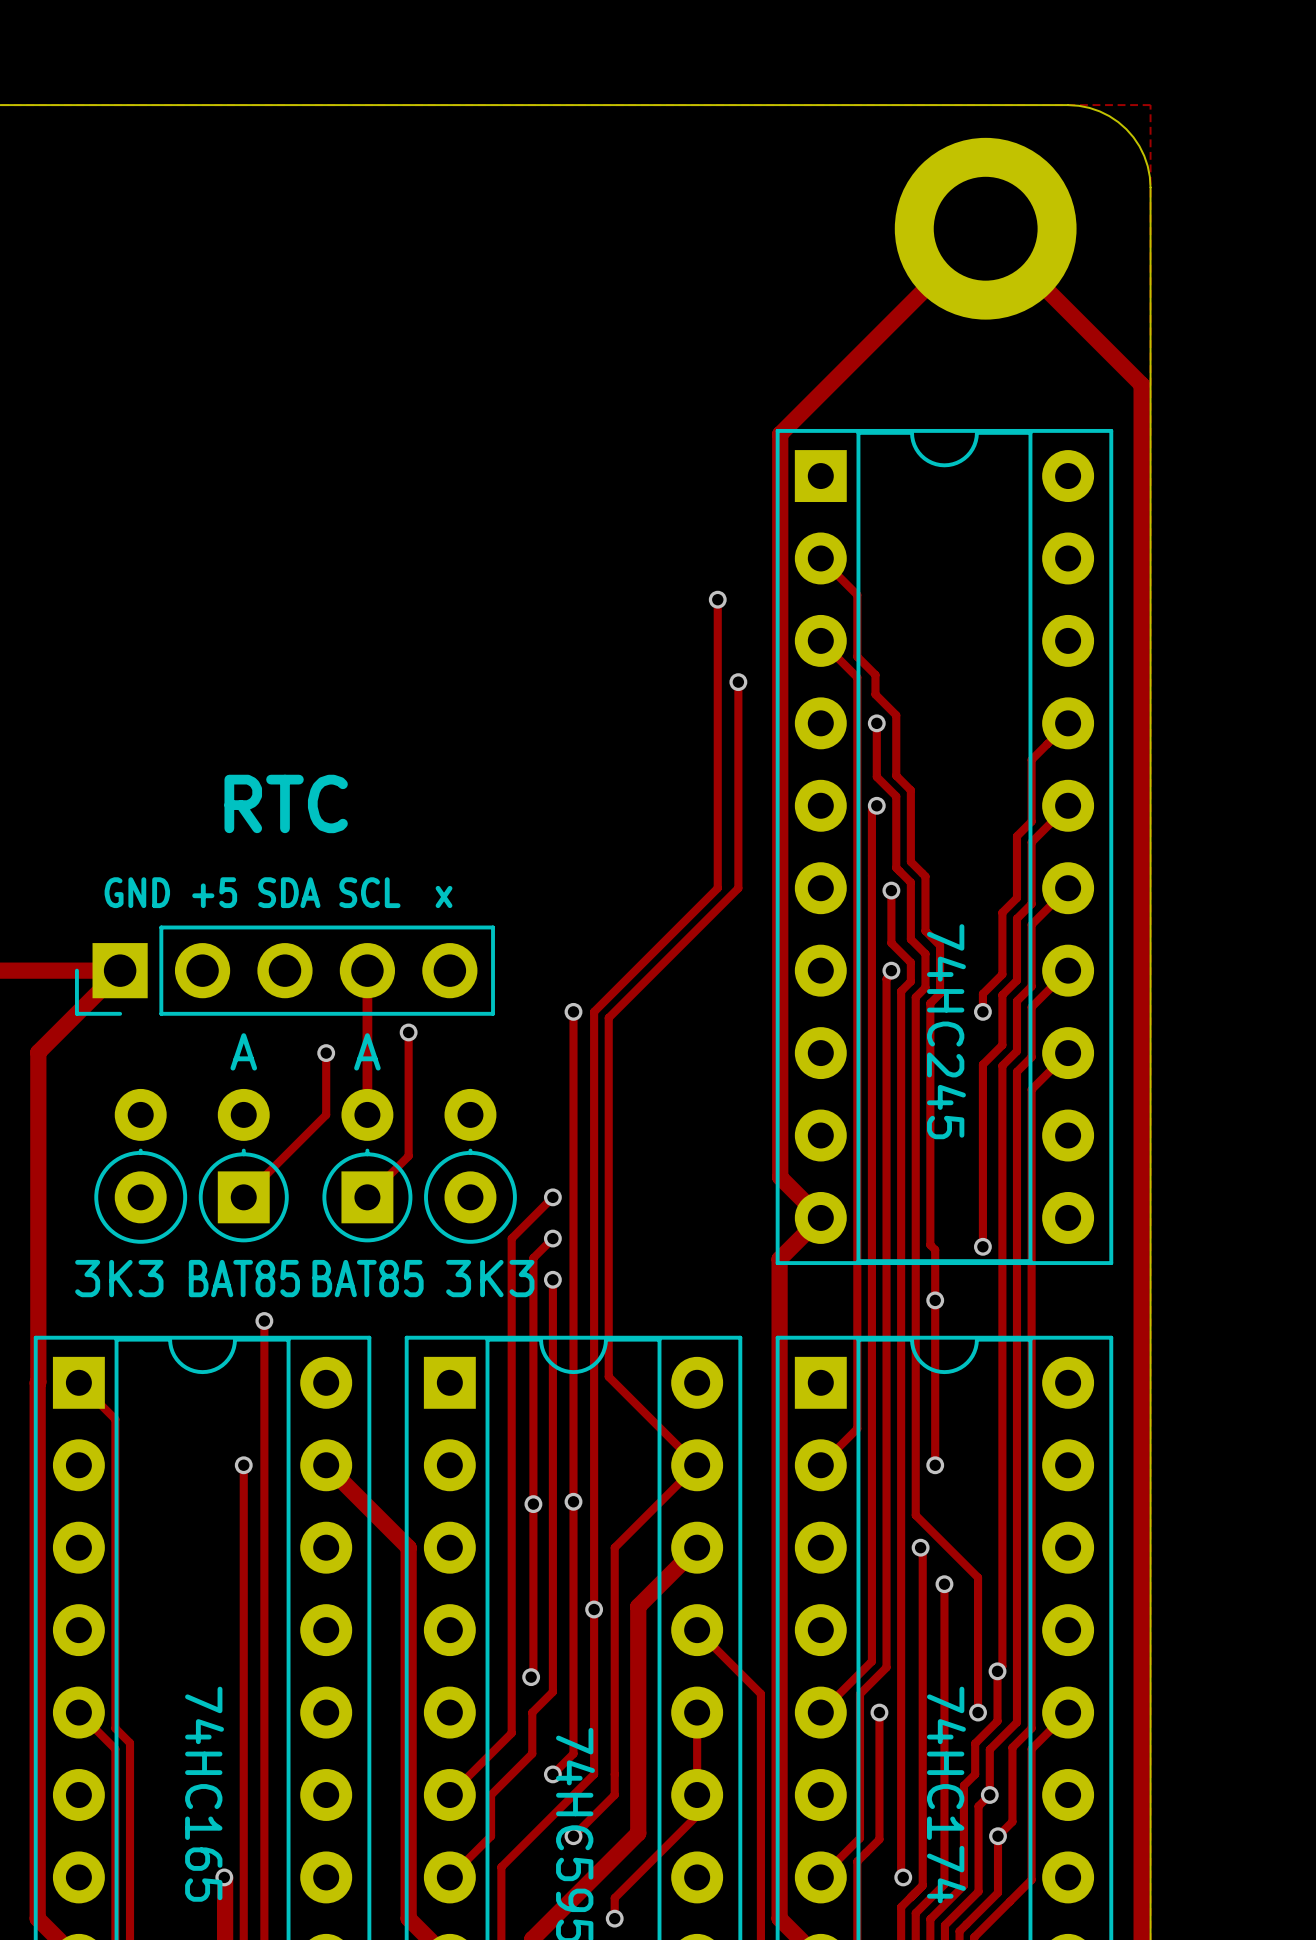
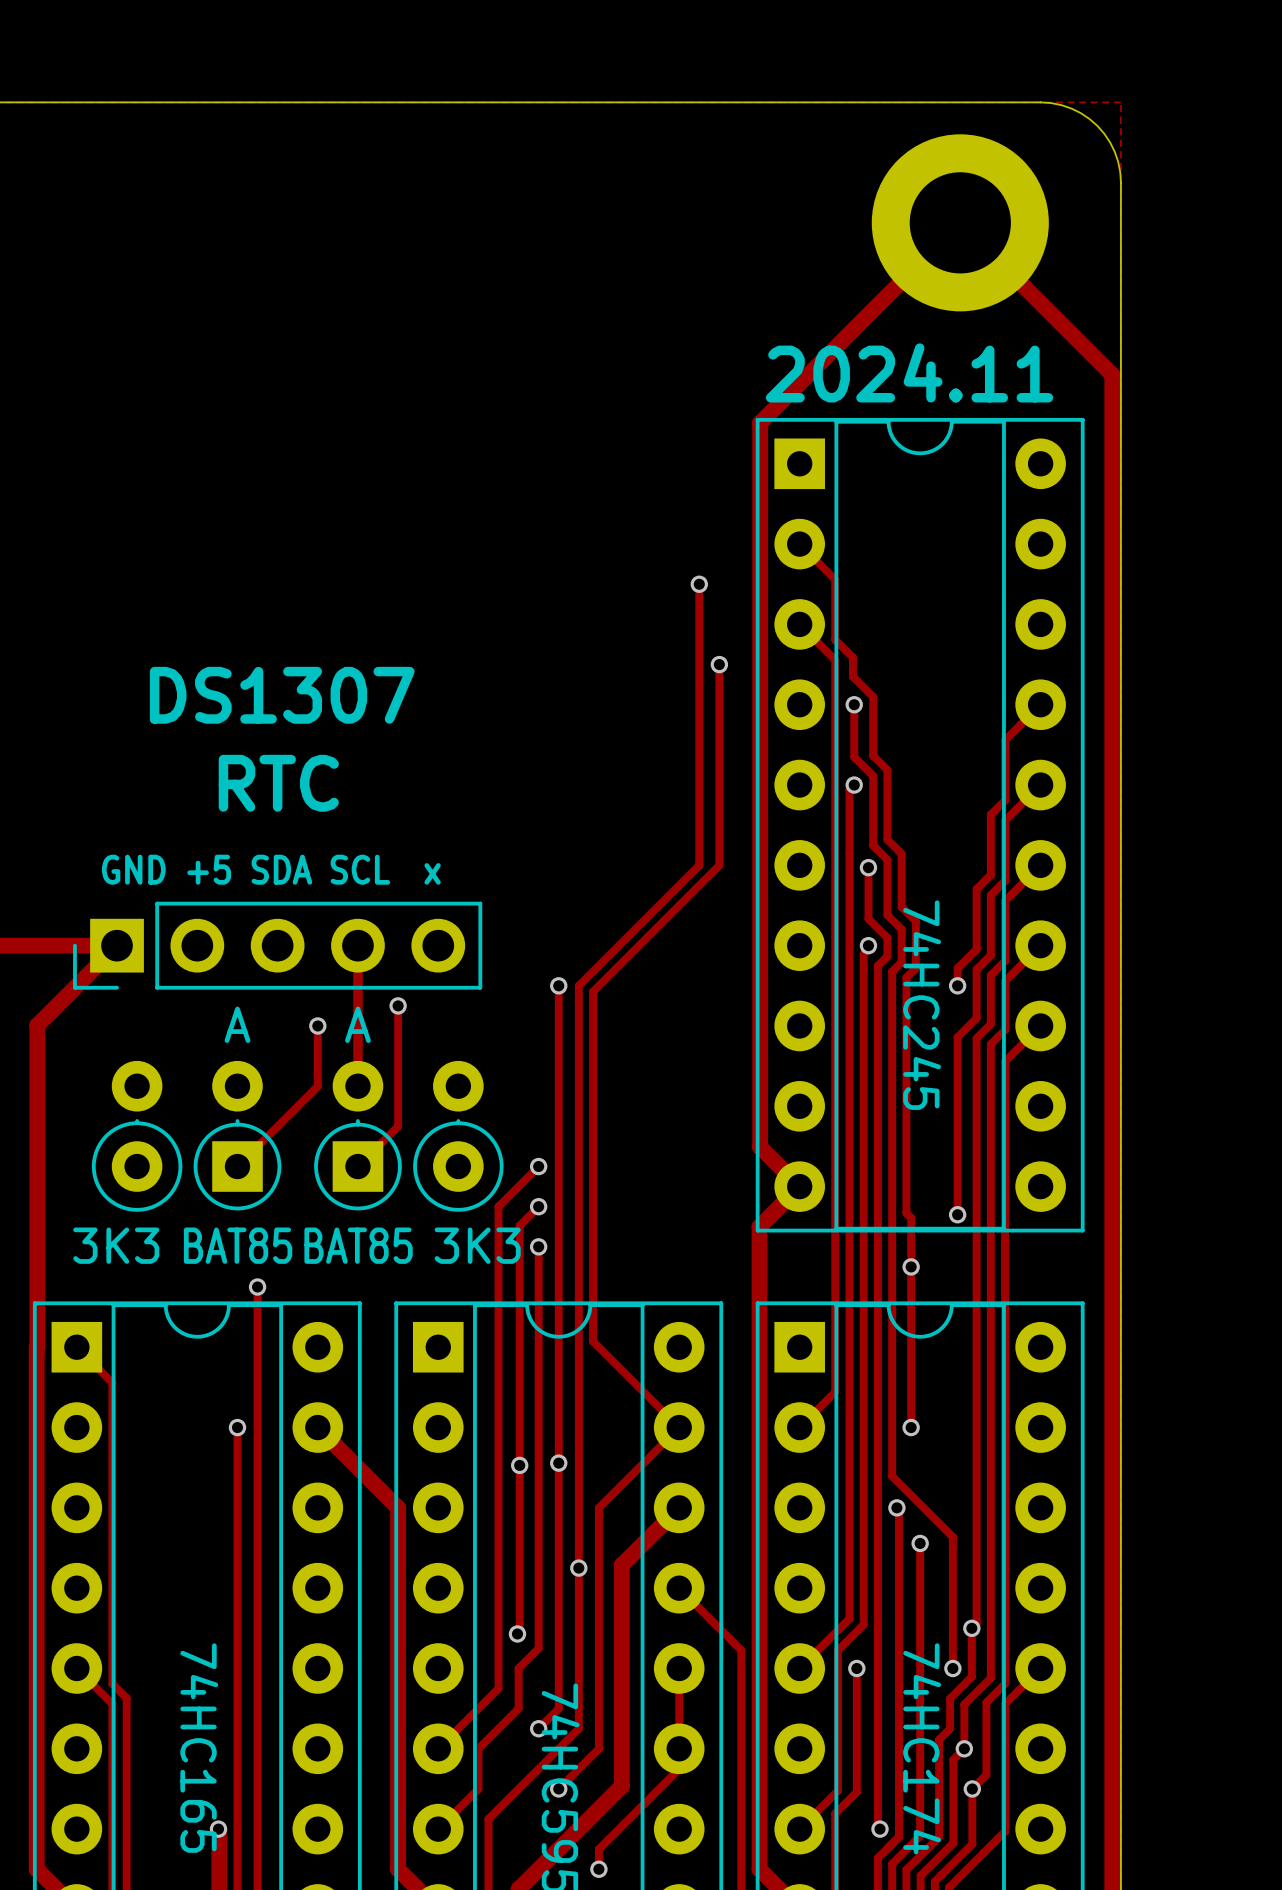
text: none -> 2024.11 (909, 372)
text: none -> DS1307 (282, 695)

